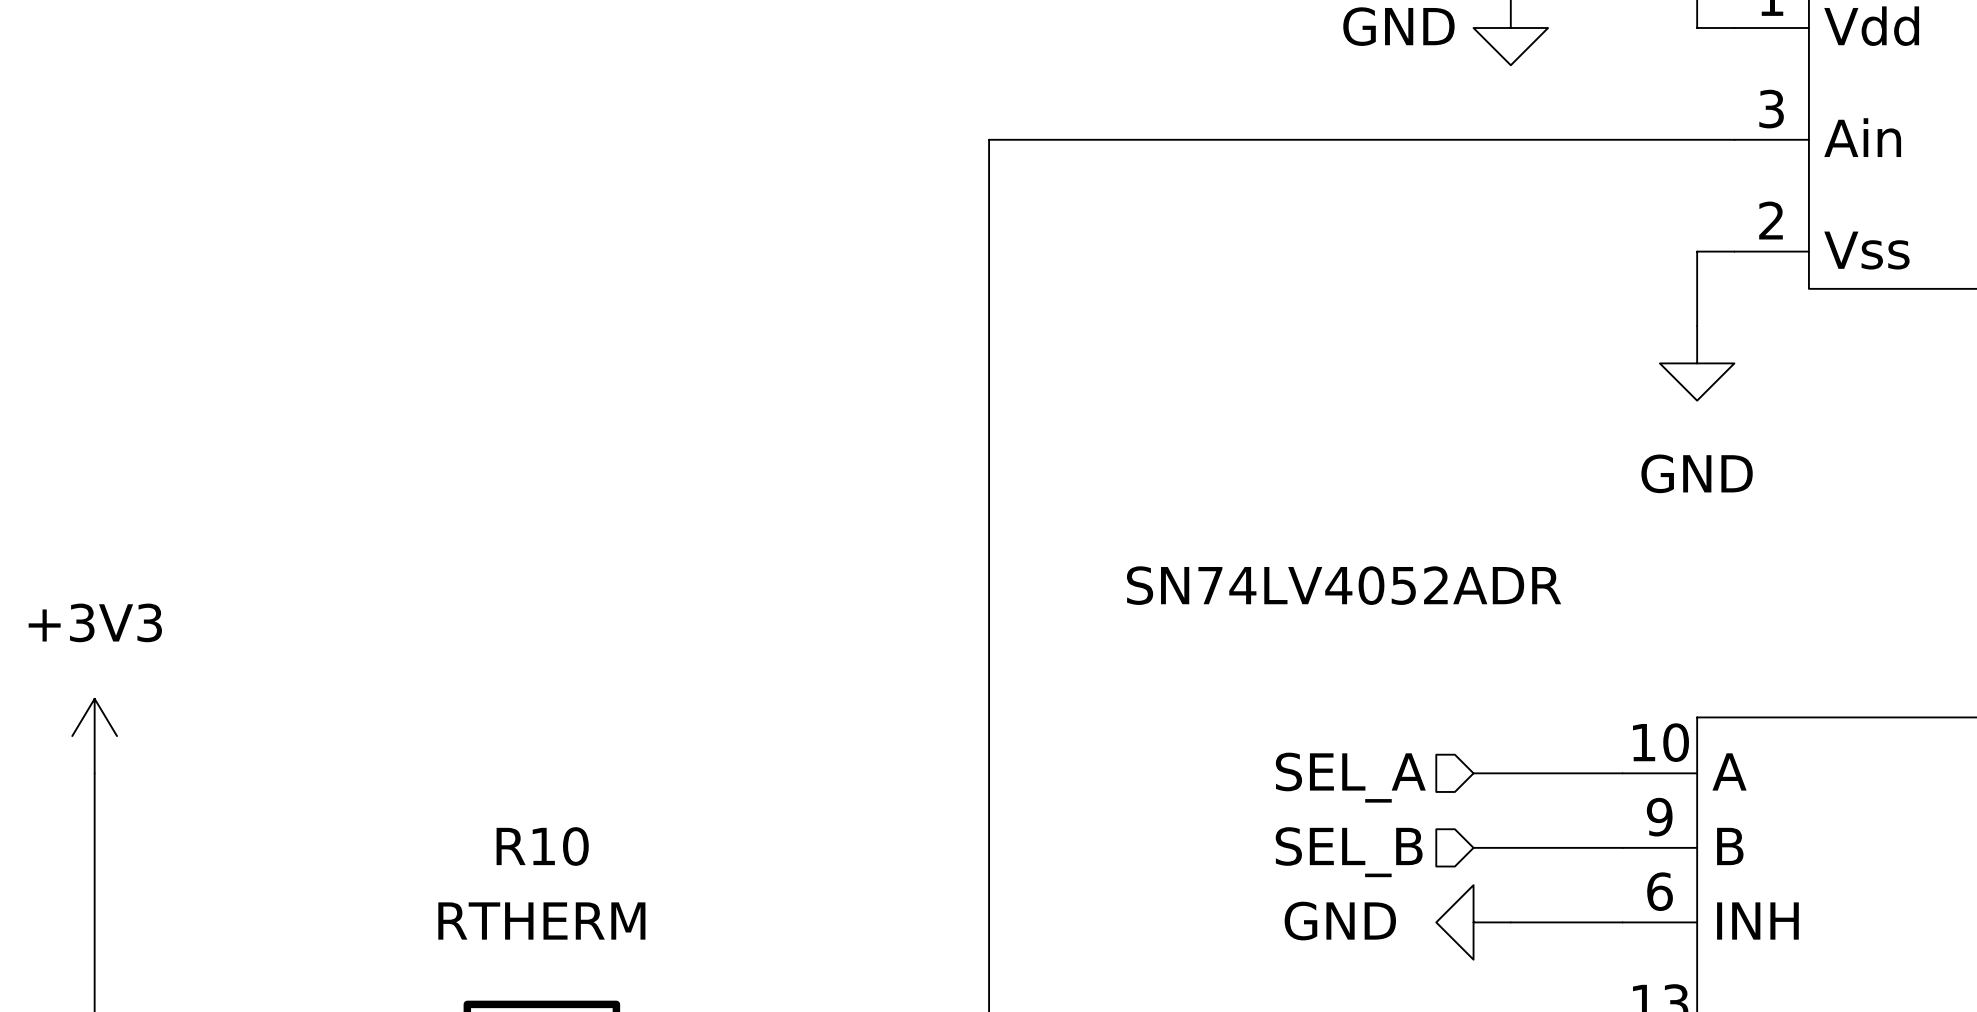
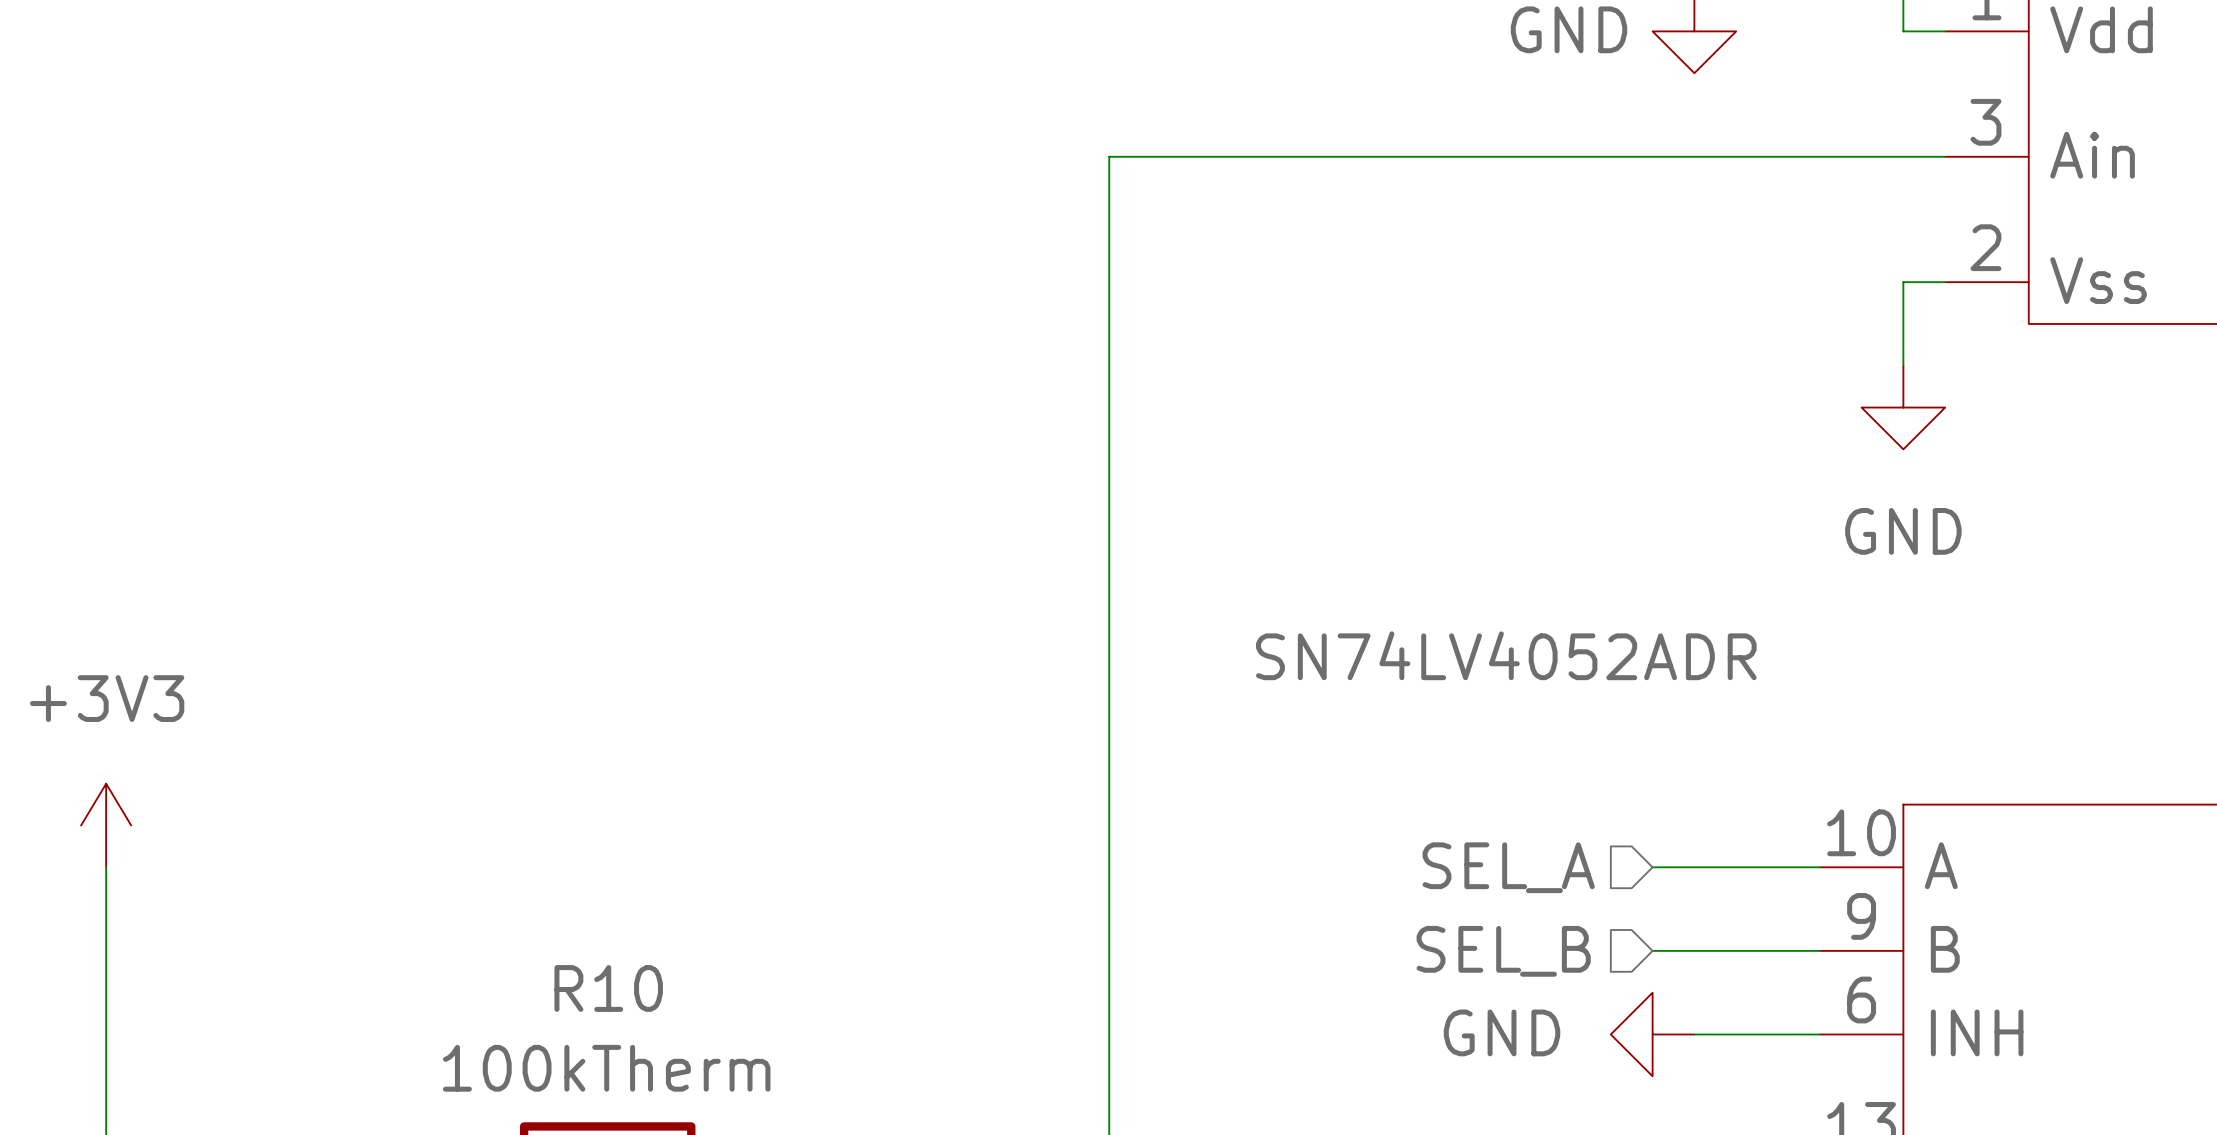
R10 name position: R10 (542, 846) -> R10 (608, 988)
R10 value: RTHERM (541, 921) -> 100kTherm (606, 1068)

